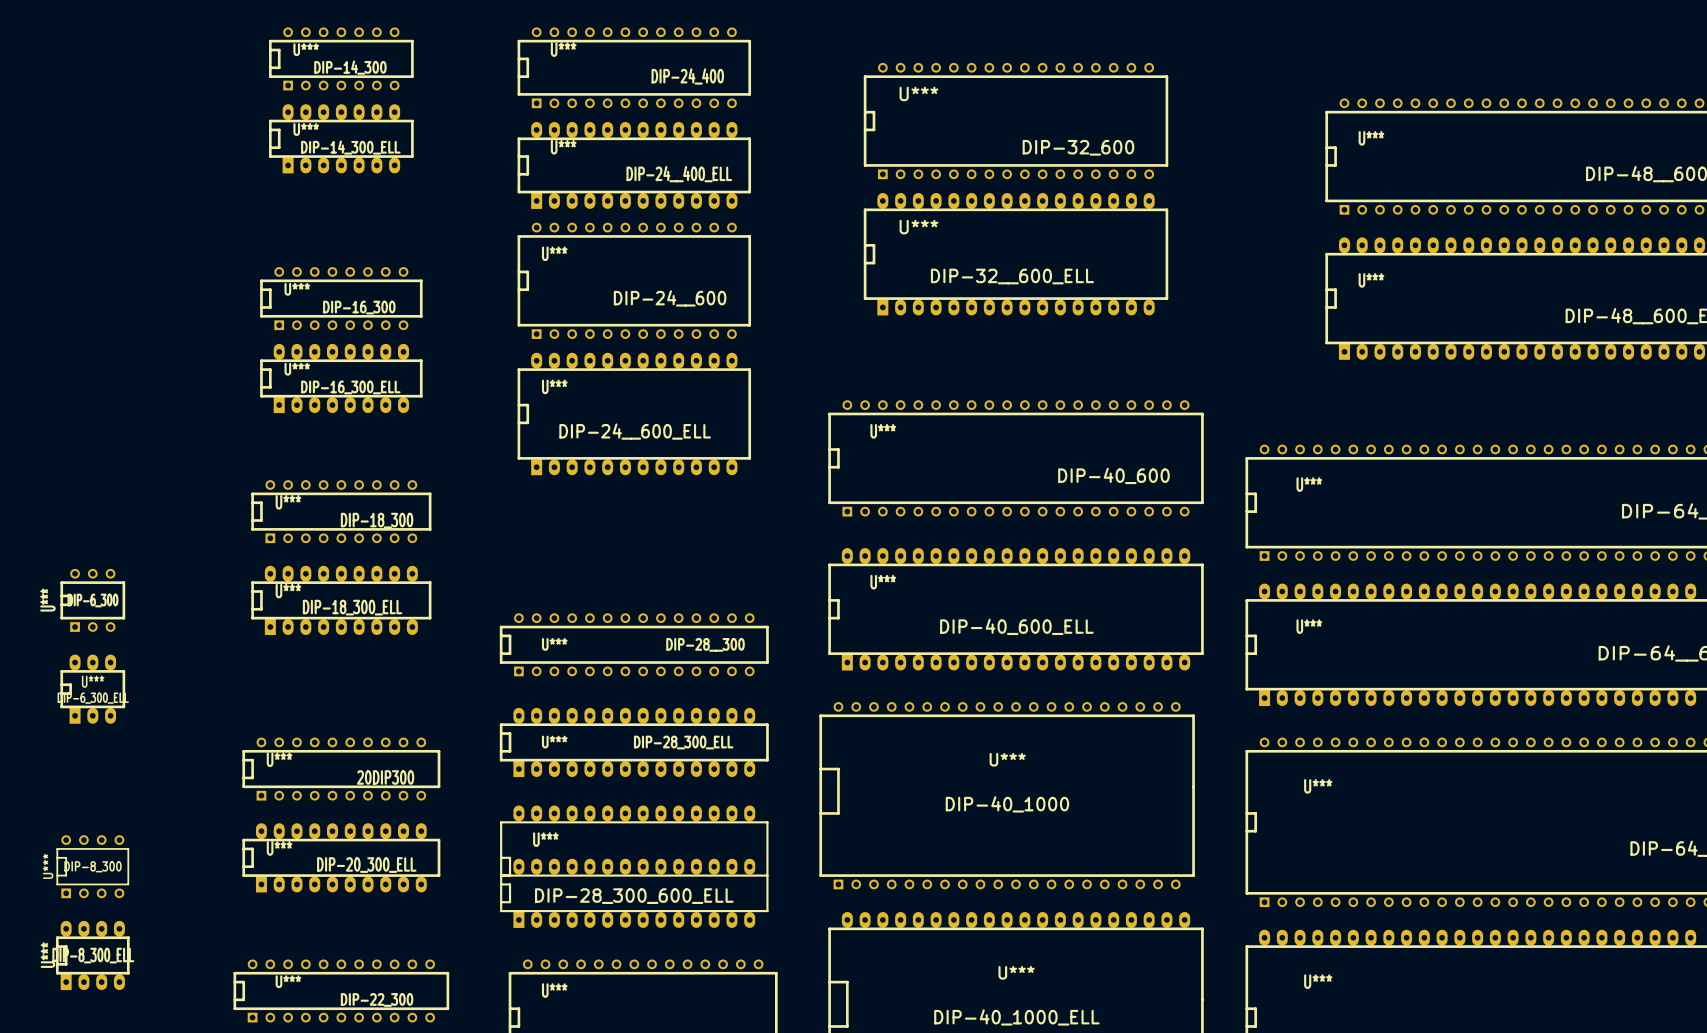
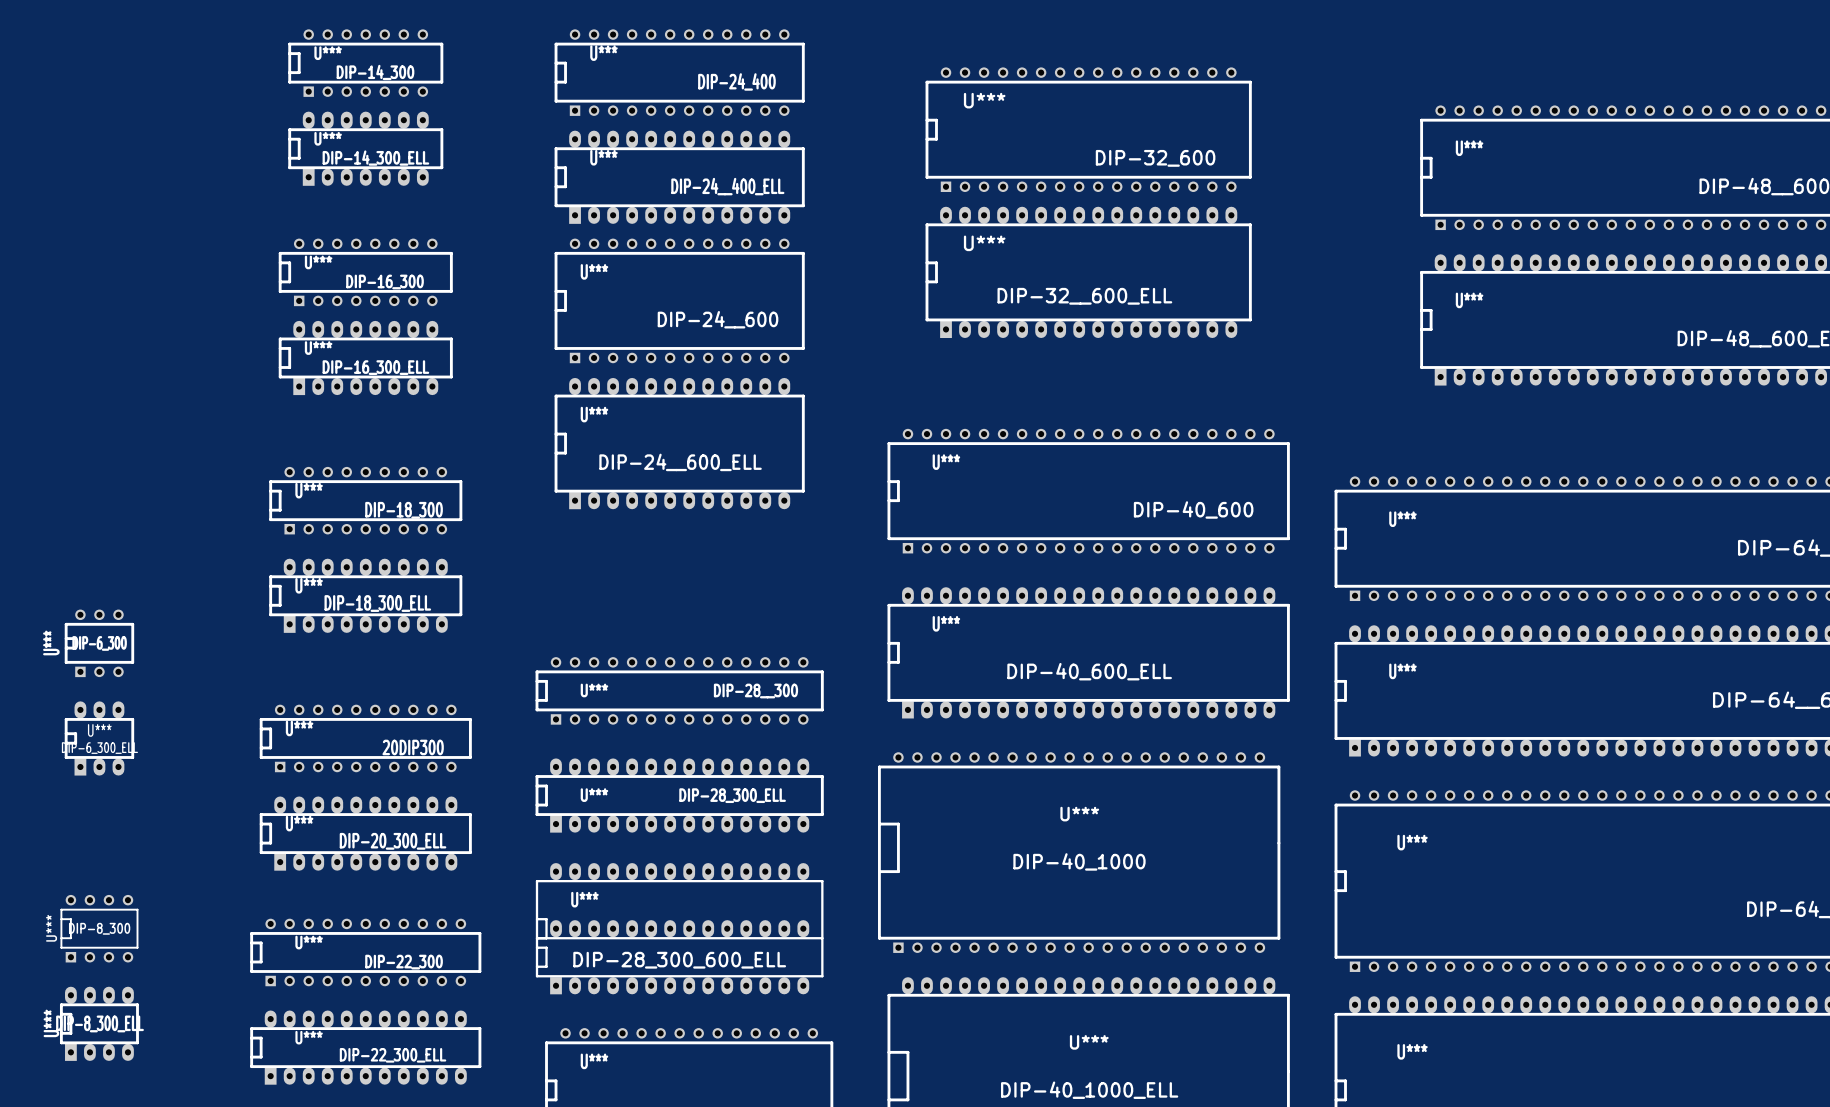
U*** position: (341, 298) -> (365, 272)
U*** position: (341, 378) -> (365, 357)
U*** position: (341, 511) -> (365, 500)
U*** position: (341, 600) -> (365, 595)
U*** position: (341, 769) -> (365, 738)
U*** position: (341, 857) -> (365, 833)
U***: none -> DIP-22_300_ELL (365, 1047)
U*** position: (341, 990) -> (365, 952)

